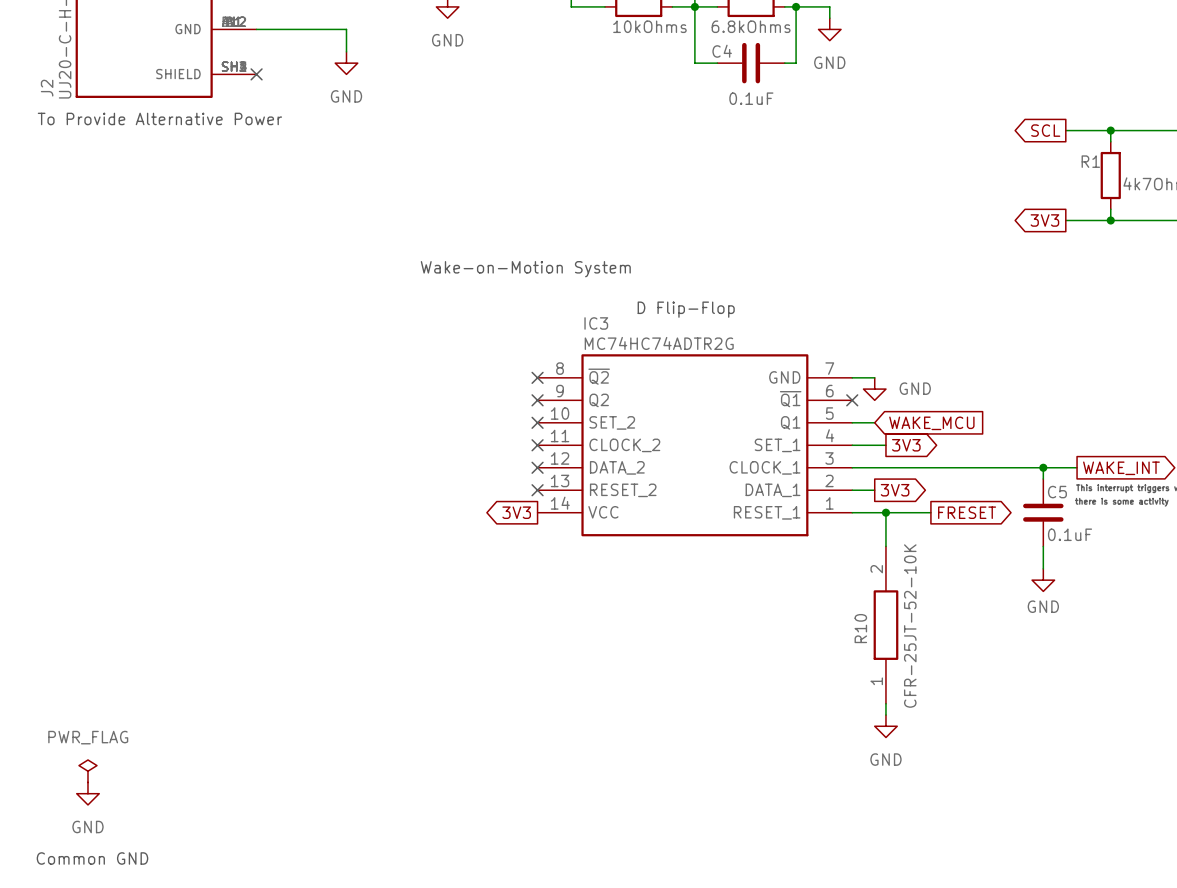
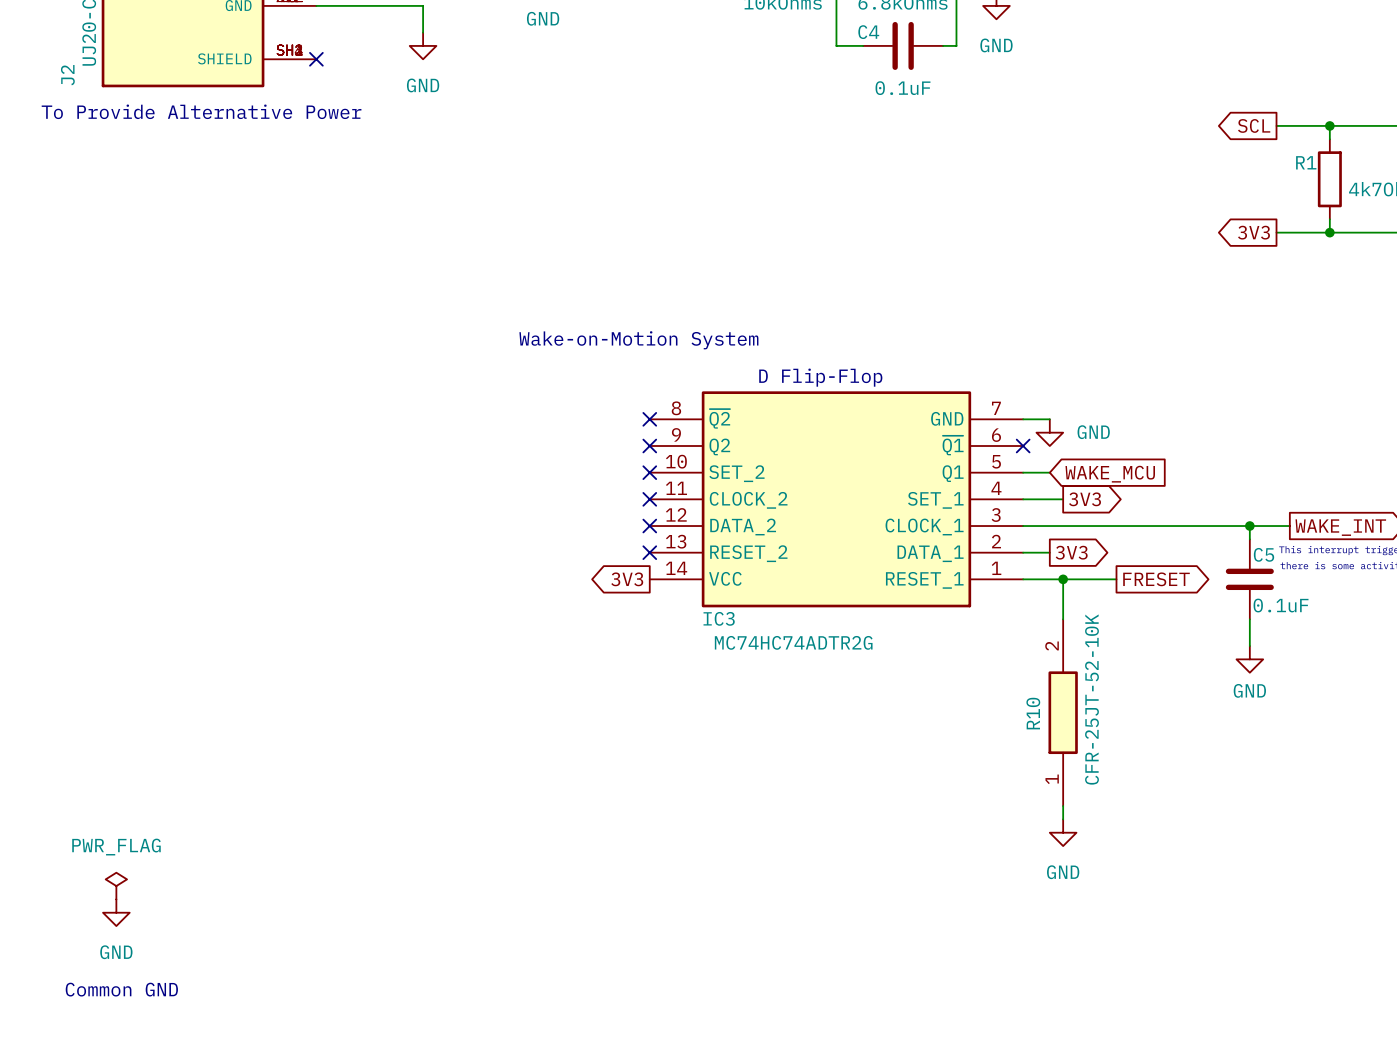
text position: Wake-on-Motion System (525, 269) -> Wake-on-Motion System (638, 340)
text position: D Flip-Flop (686, 309) -> D Flip-Flop (820, 377)
IC3 name position: IC3 (596, 323) -> IC3 (719, 618)
IC3 value position: MC74HC74ADTR2G (659, 343) -> MC74HC74ADTR2G (793, 642)

